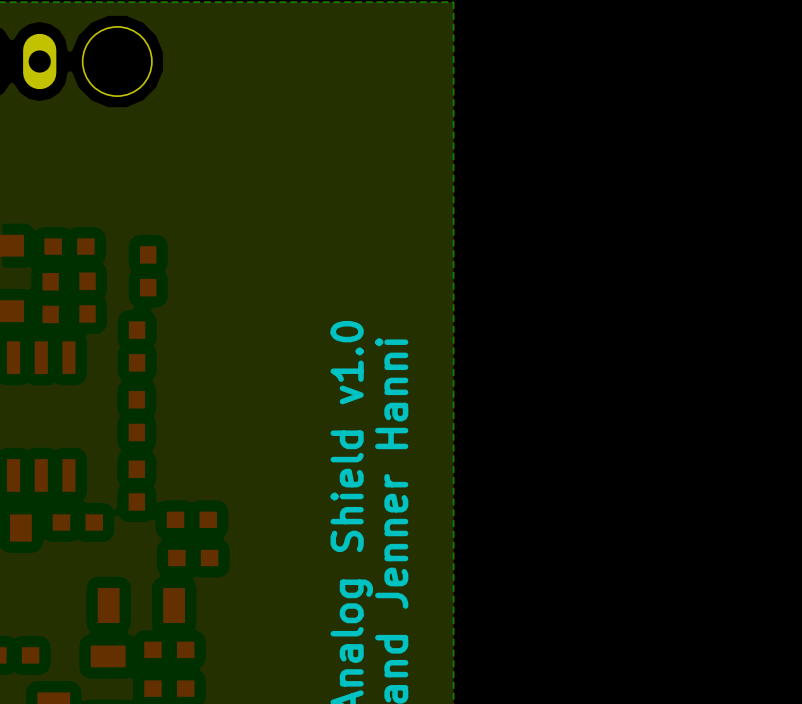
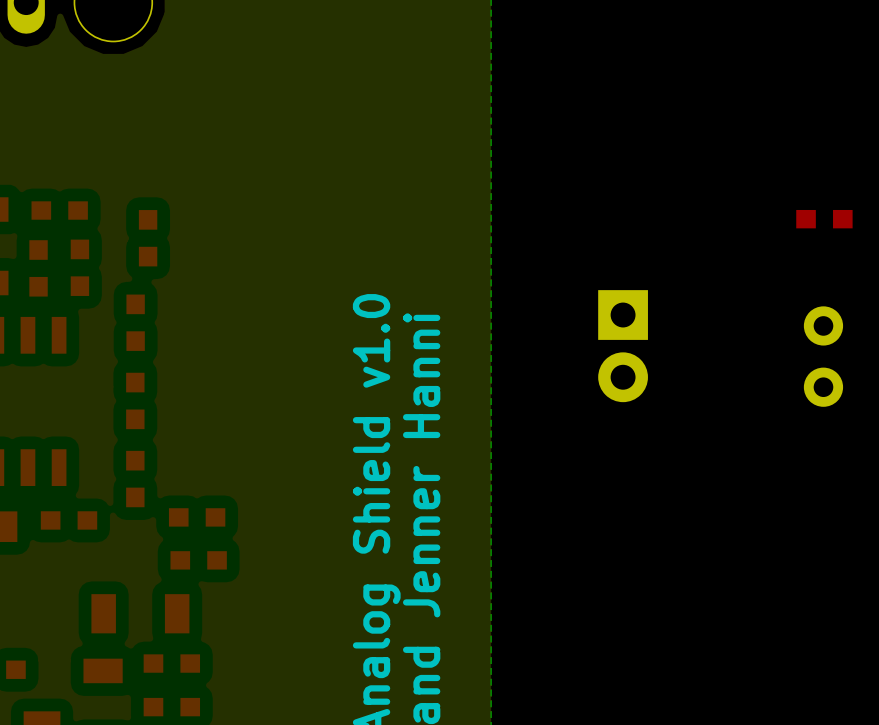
part: none -> (824, 219)
part: none -> (623, 346)
part: none -> (823, 356)

